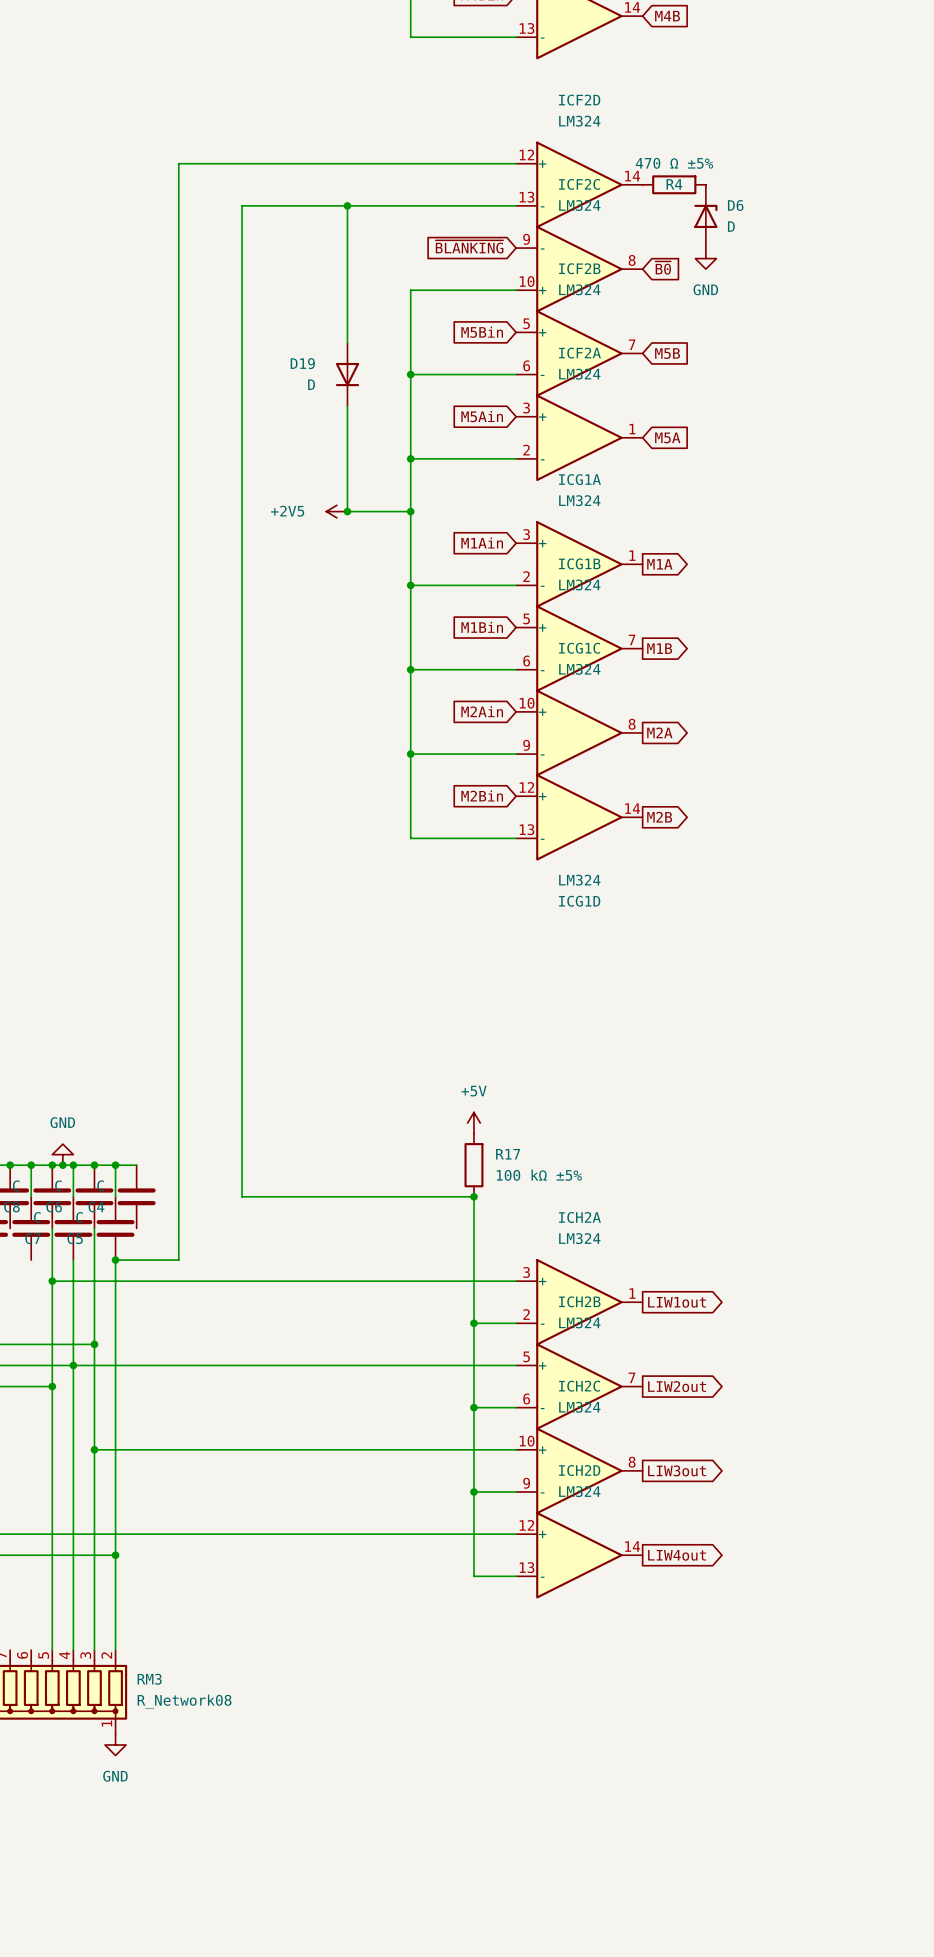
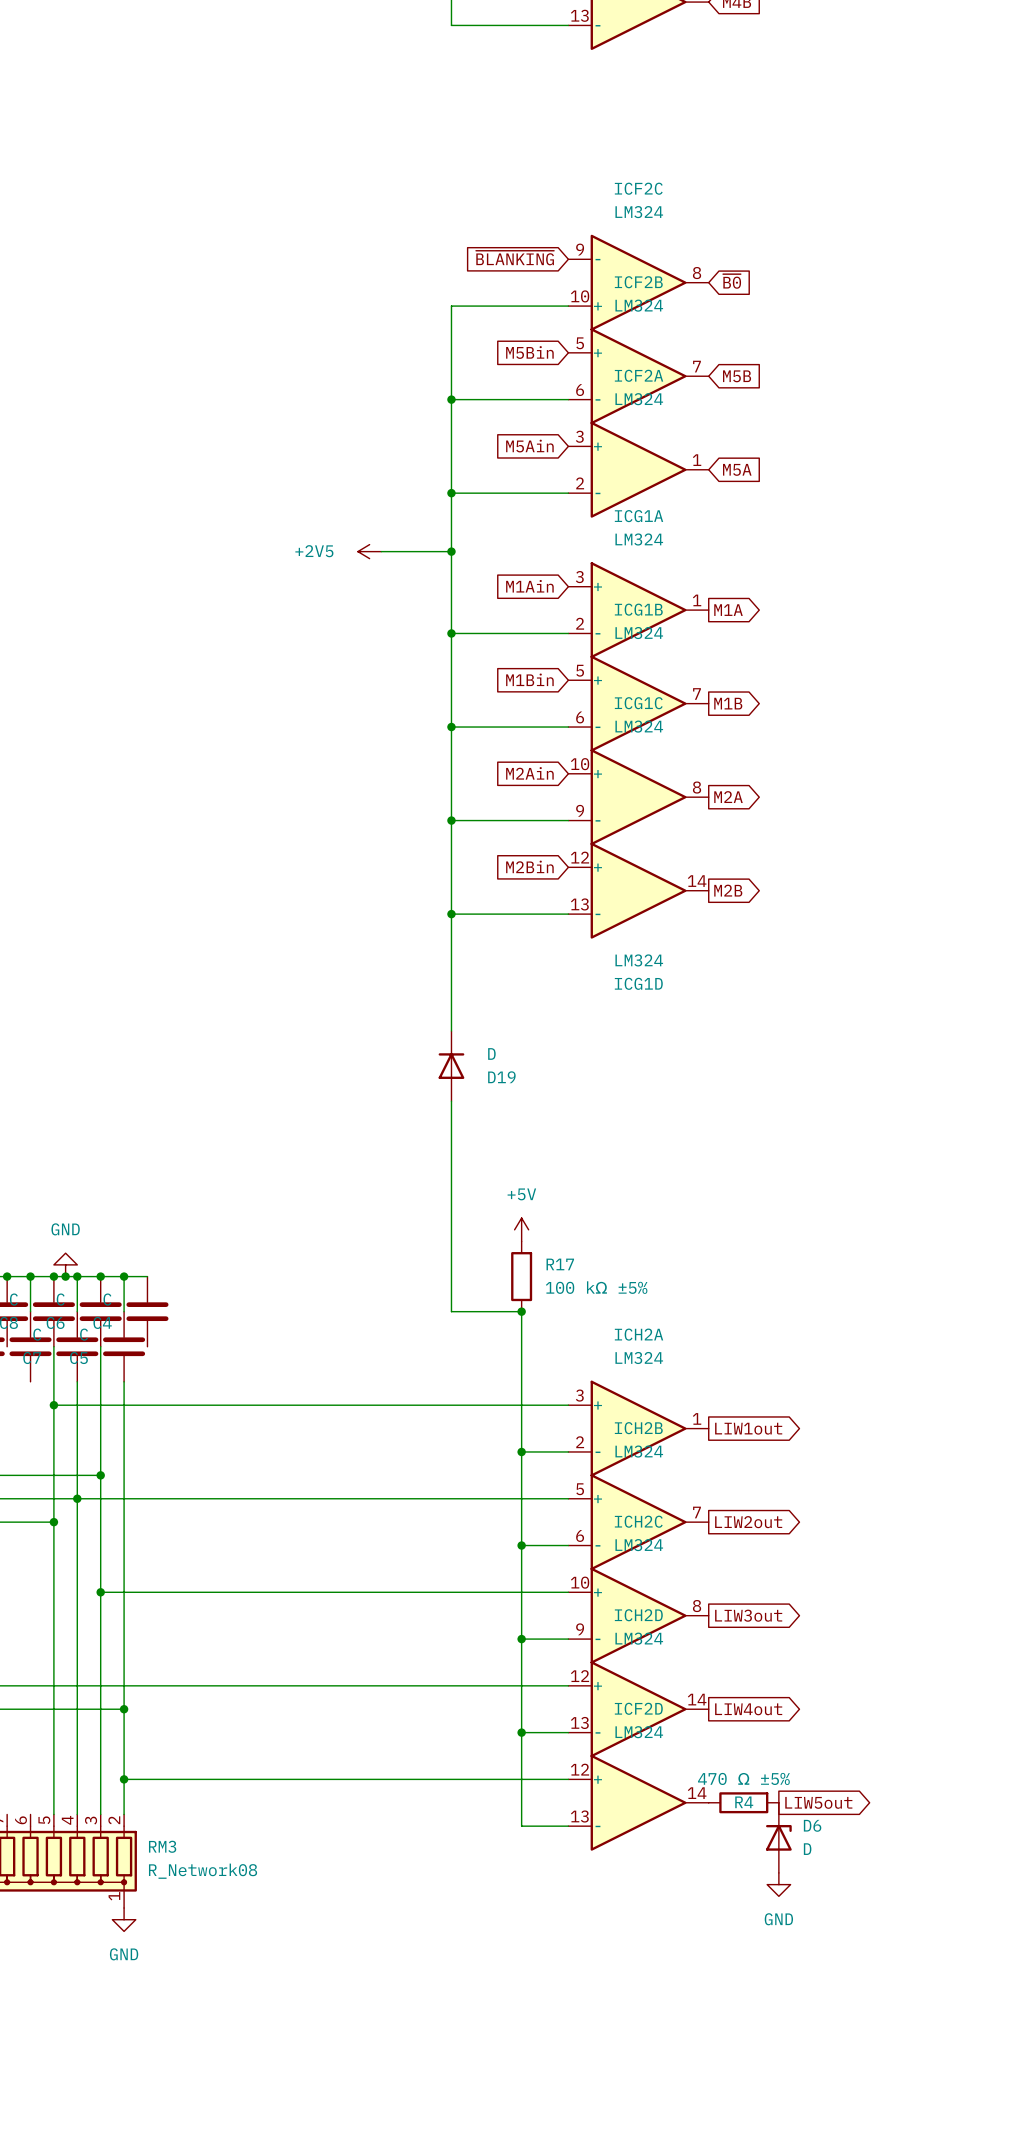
wire: (516, 163) (178, 163) (178, 1260) (115, 1260) -> none
ICF2D position: (579, 184) -> (638, 1802)
R4 position: (674, 184) -> (743, 1802)
wire: (347, 205) (347, 342) -> none
junction: (347, 205) -> none
wire: (516, 205) (242, 205) (242, 1196) (410, 1196) -> (451, 1101) (451, 1311)
D6 position: (705, 216) -> (778, 1837)
power symbol: GND (705, 258) -> none
D19 rotation: 0° (347, 374) -> 180° (451, 1066)
D19 position: (347, 374) -> (451, 1066)
wire: (347, 406) (347, 511) -> none
junction: (347, 511) -> none
wire: none -> (451, 914) (451, 1031)
junction: none -> (451, 914)
junction: (115, 1260) -> none
wire: none -> (521, 1732) (521, 1826) (568, 1826)
junction: none -> (521, 1732)
wire: none -> (124, 1779) (568, 1779)
junction: none -> (124, 1779)
global label: none -> LIW5out (818, 1802)
power symbol: none -> GND (778, 1884)

